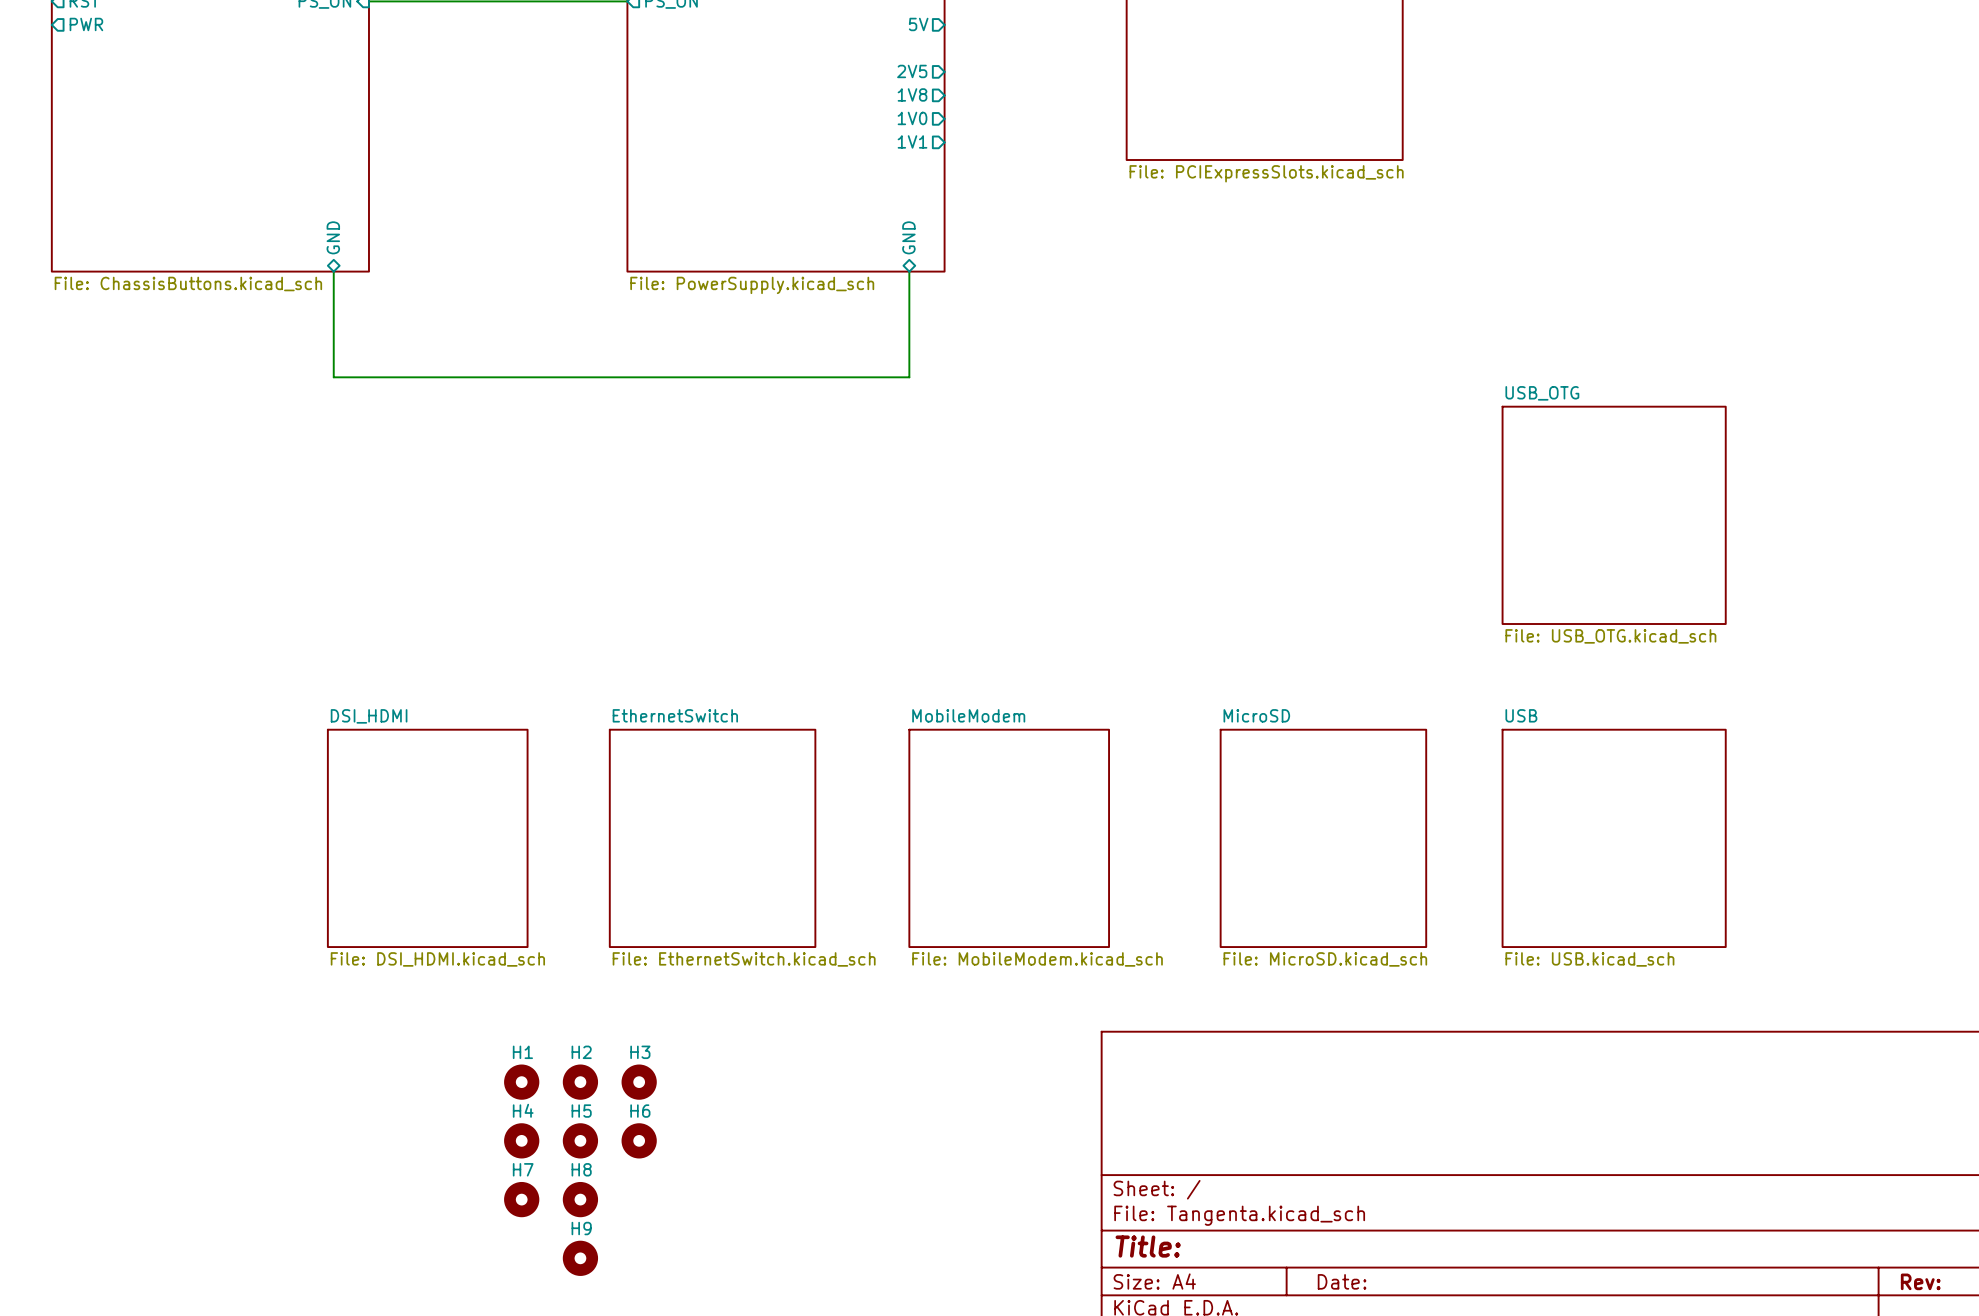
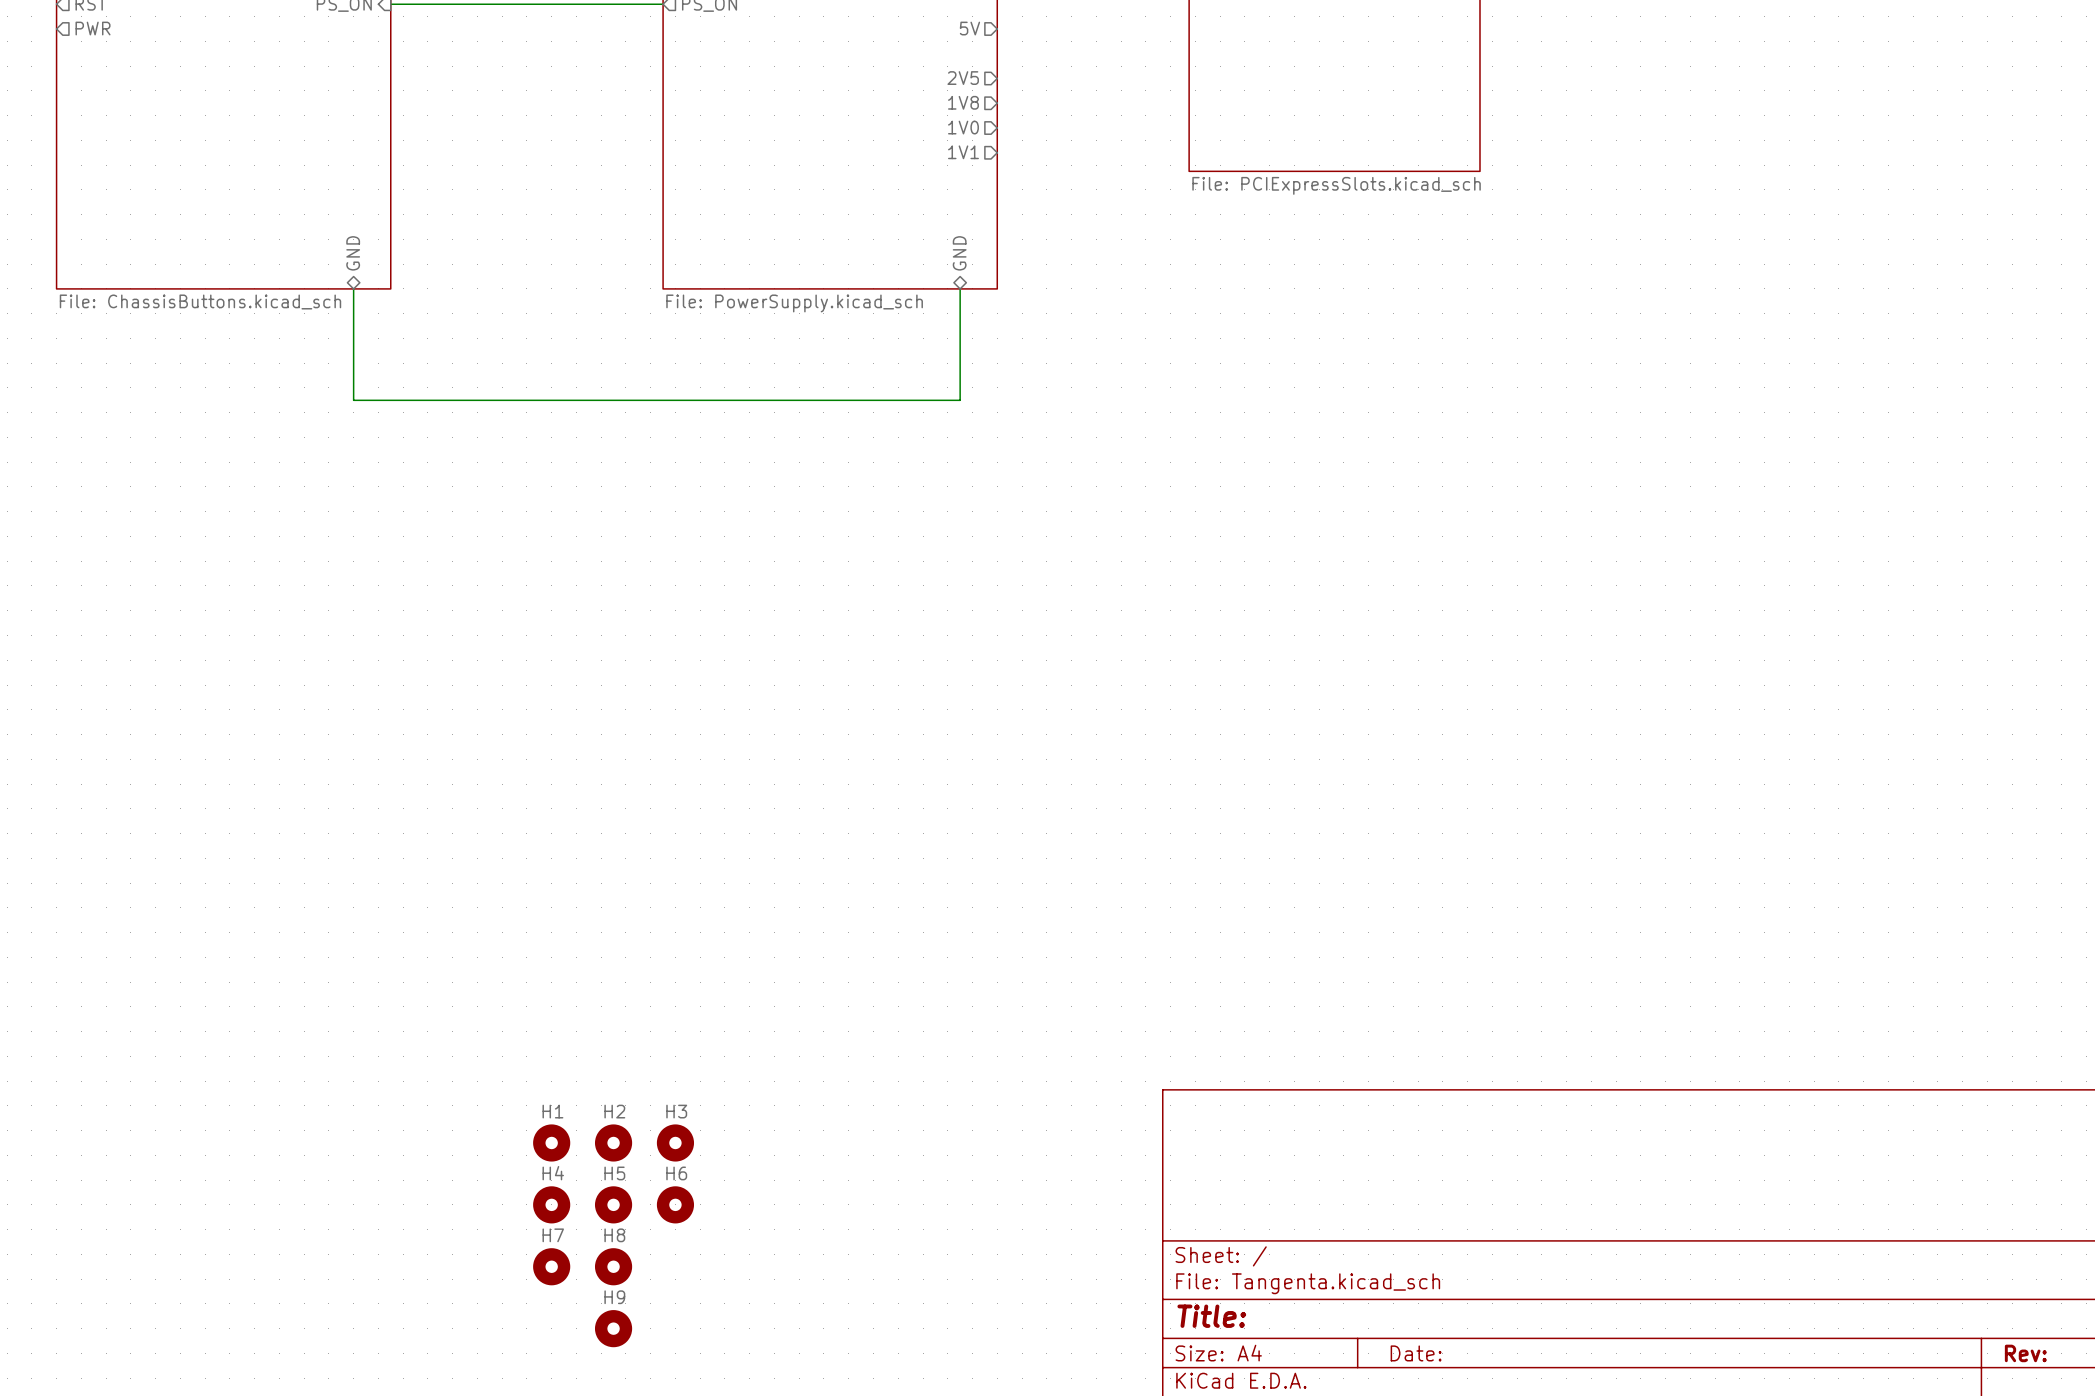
sheet USB_OTG: File: USB_OTG.kicad_sch (1614, 515) -> none
sheet DSI_HDMI: File: DSI_HDMI.kicad_sch (427, 838) -> none
sheet EthernetSwitch: File: EthernetSwitch.kicad_sch (712, 838) -> none
sheet MobileModem: File: MobileModem.kicad_sch (1009, 838) -> none
sheet MicroSD: File: MicroSD.kicad_sch (1323, 838) -> none
sheet USB: File: USB.kicad_sch (1614, 838) -> none

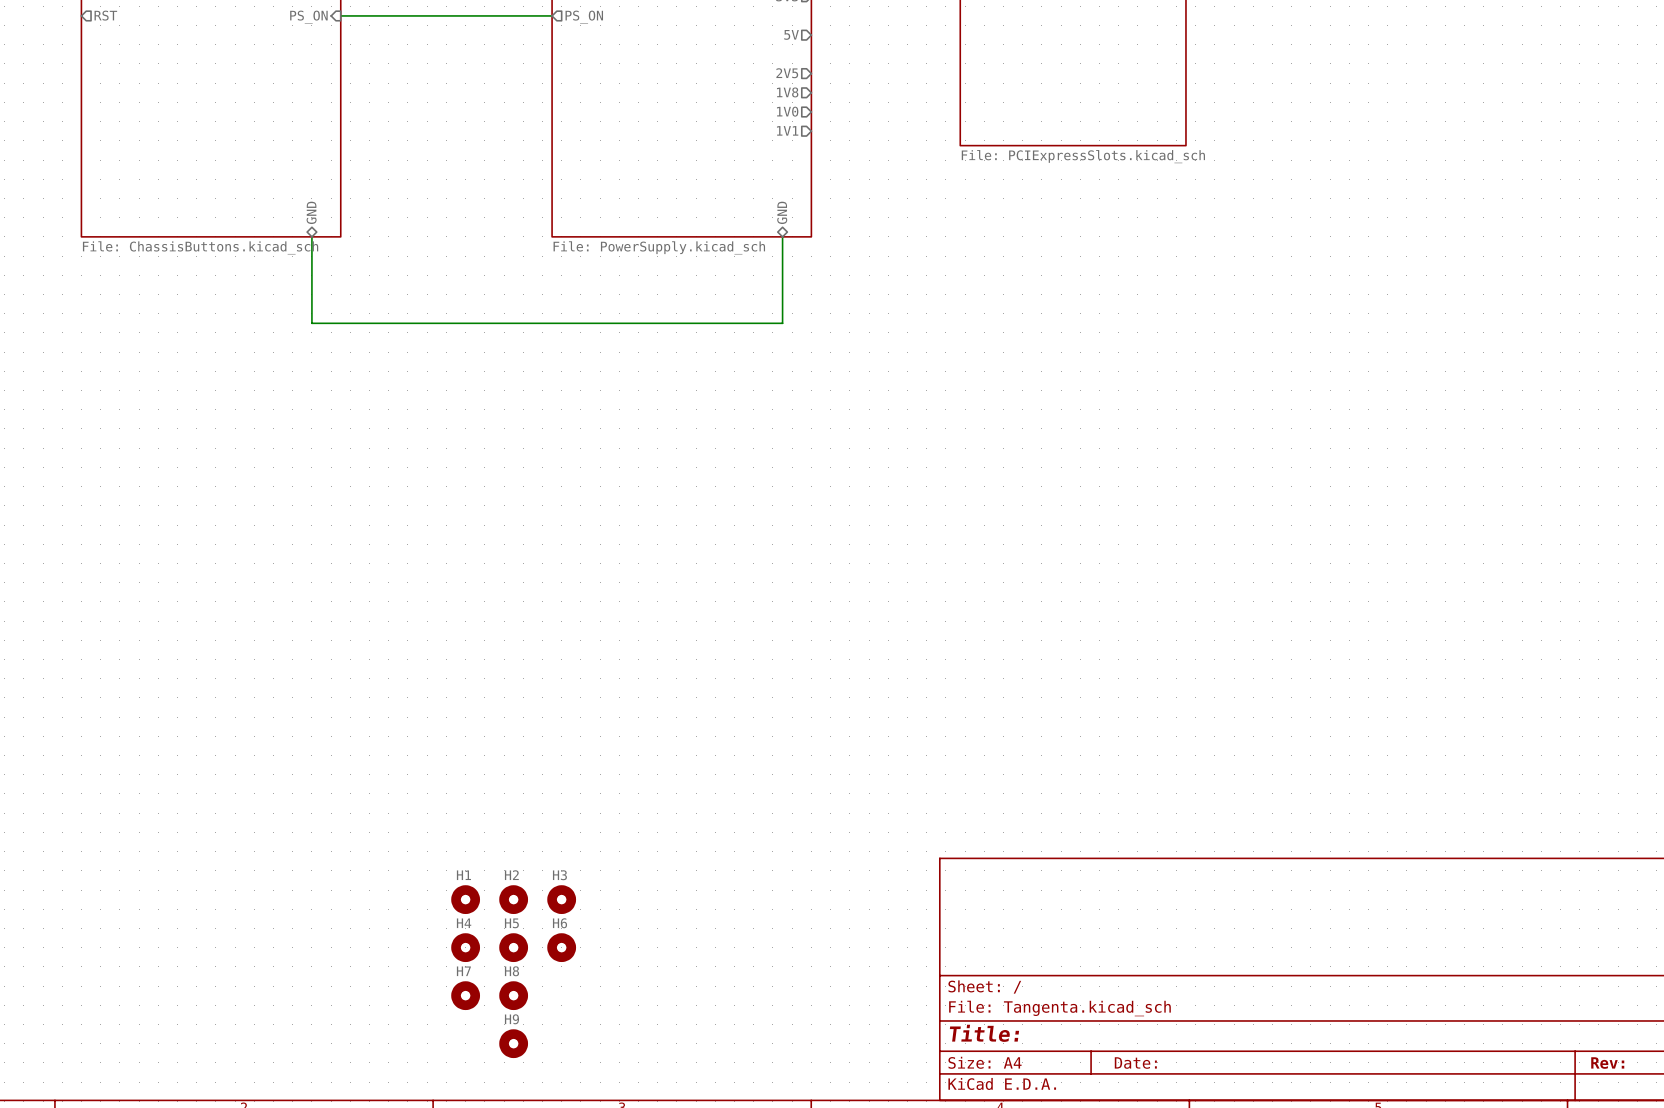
sheet pin: PWR (93, 28) -> none

